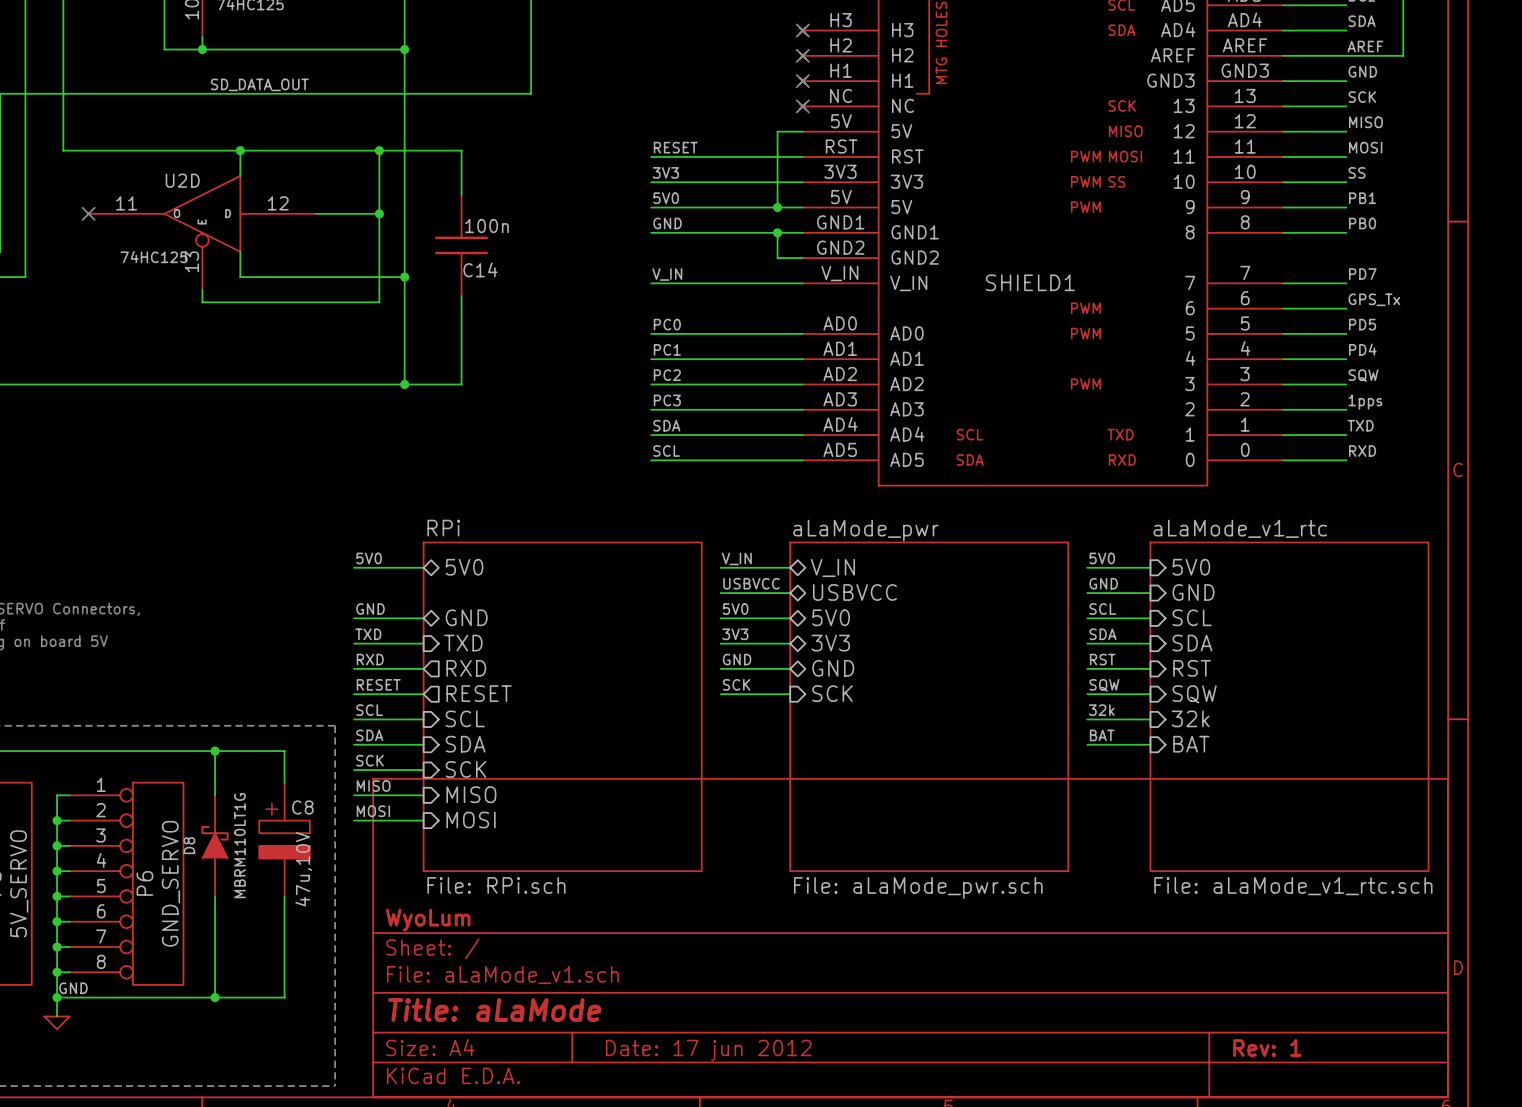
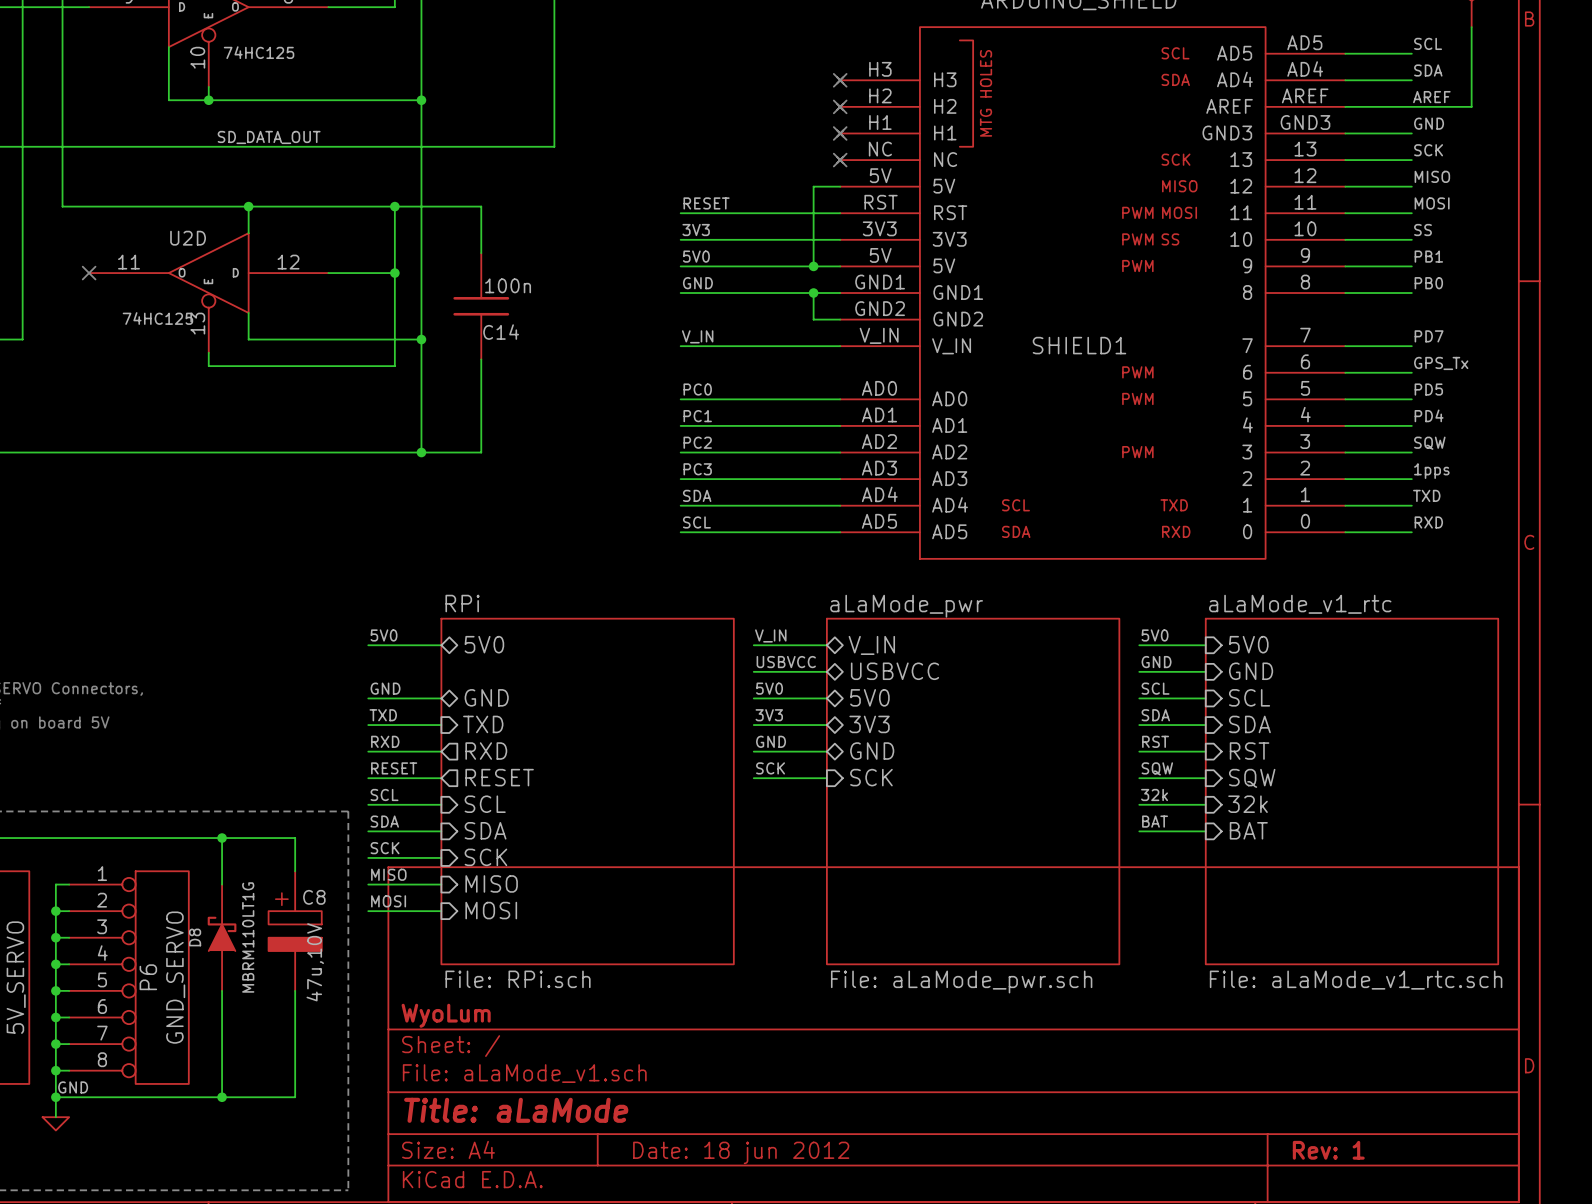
title block: Date: 17 jun 2012 (708, 1050) -> Date: 18 jun 2012 (741, 1152)

